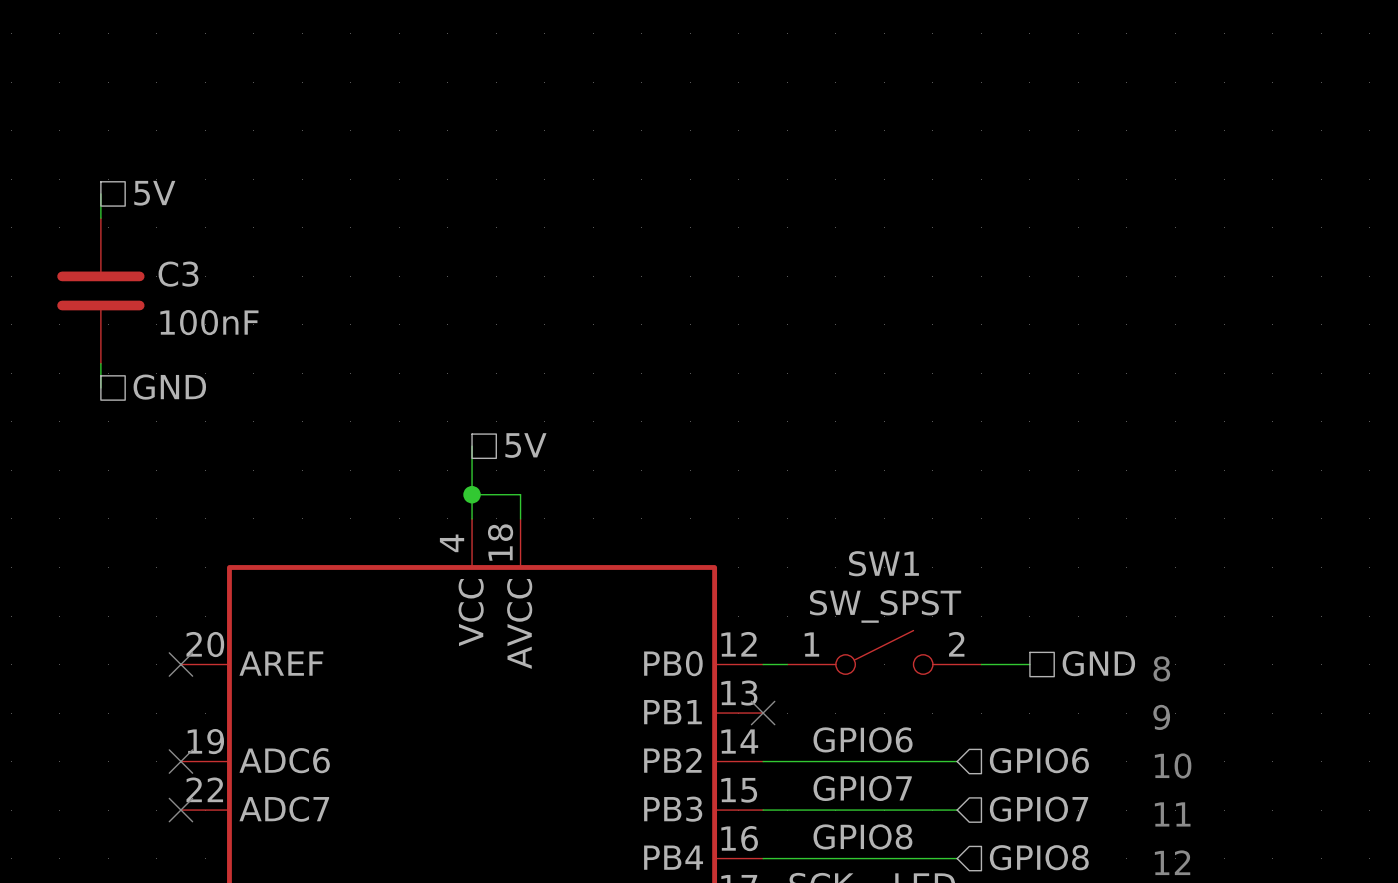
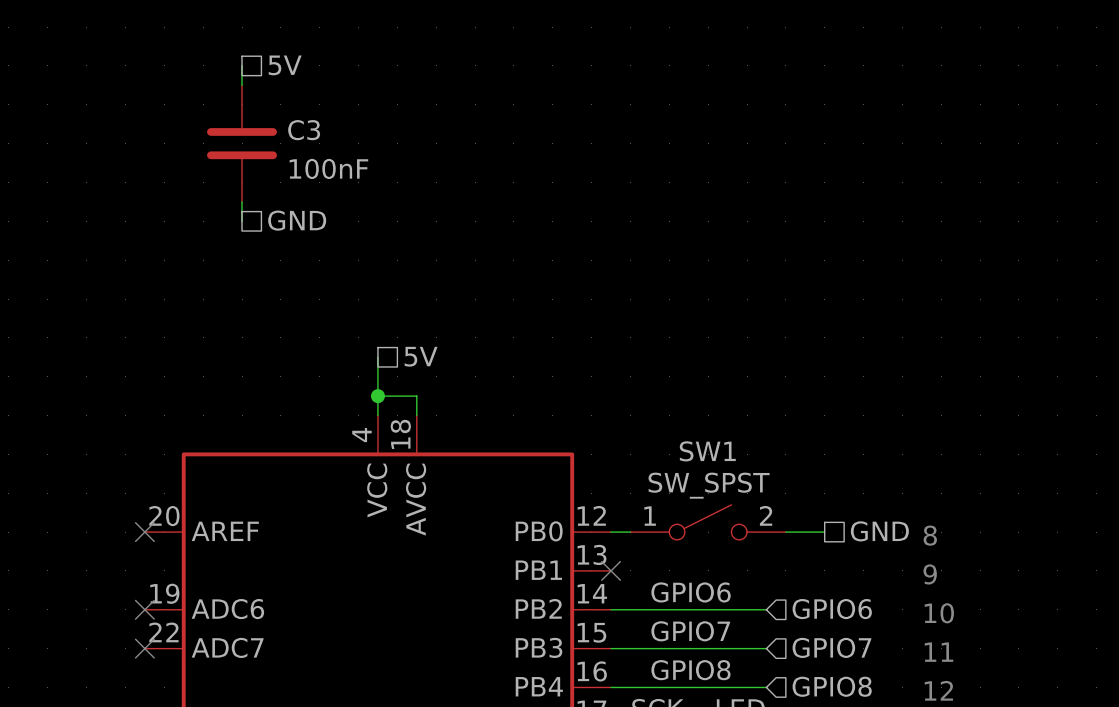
wire: (100, 193) (100, 218) -> (242, 201) (242, 221)
hierarchical label position: 5V (154, 193) -> 5V (285, 65)
C3 position: (100, 290) -> (242, 143)
wire: (100, 363) (100, 387) -> (242, 65) (242, 85)
hierarchical label position: GND (169, 387) -> GND (297, 220)

